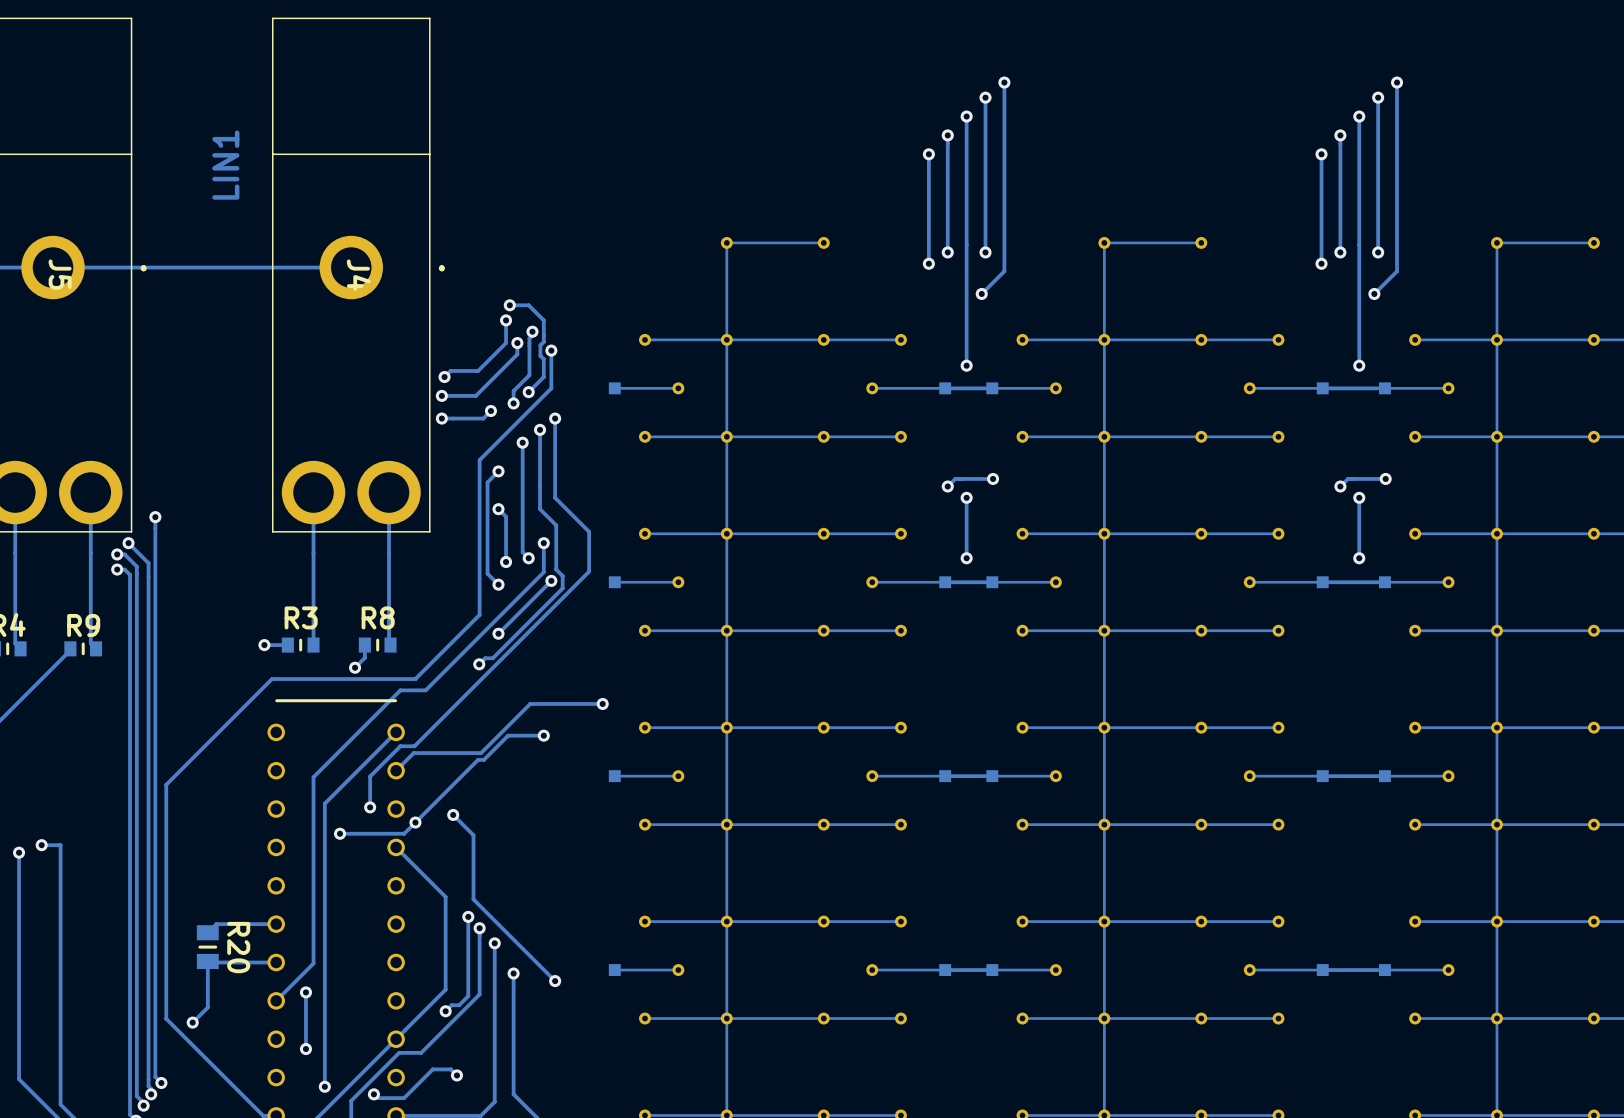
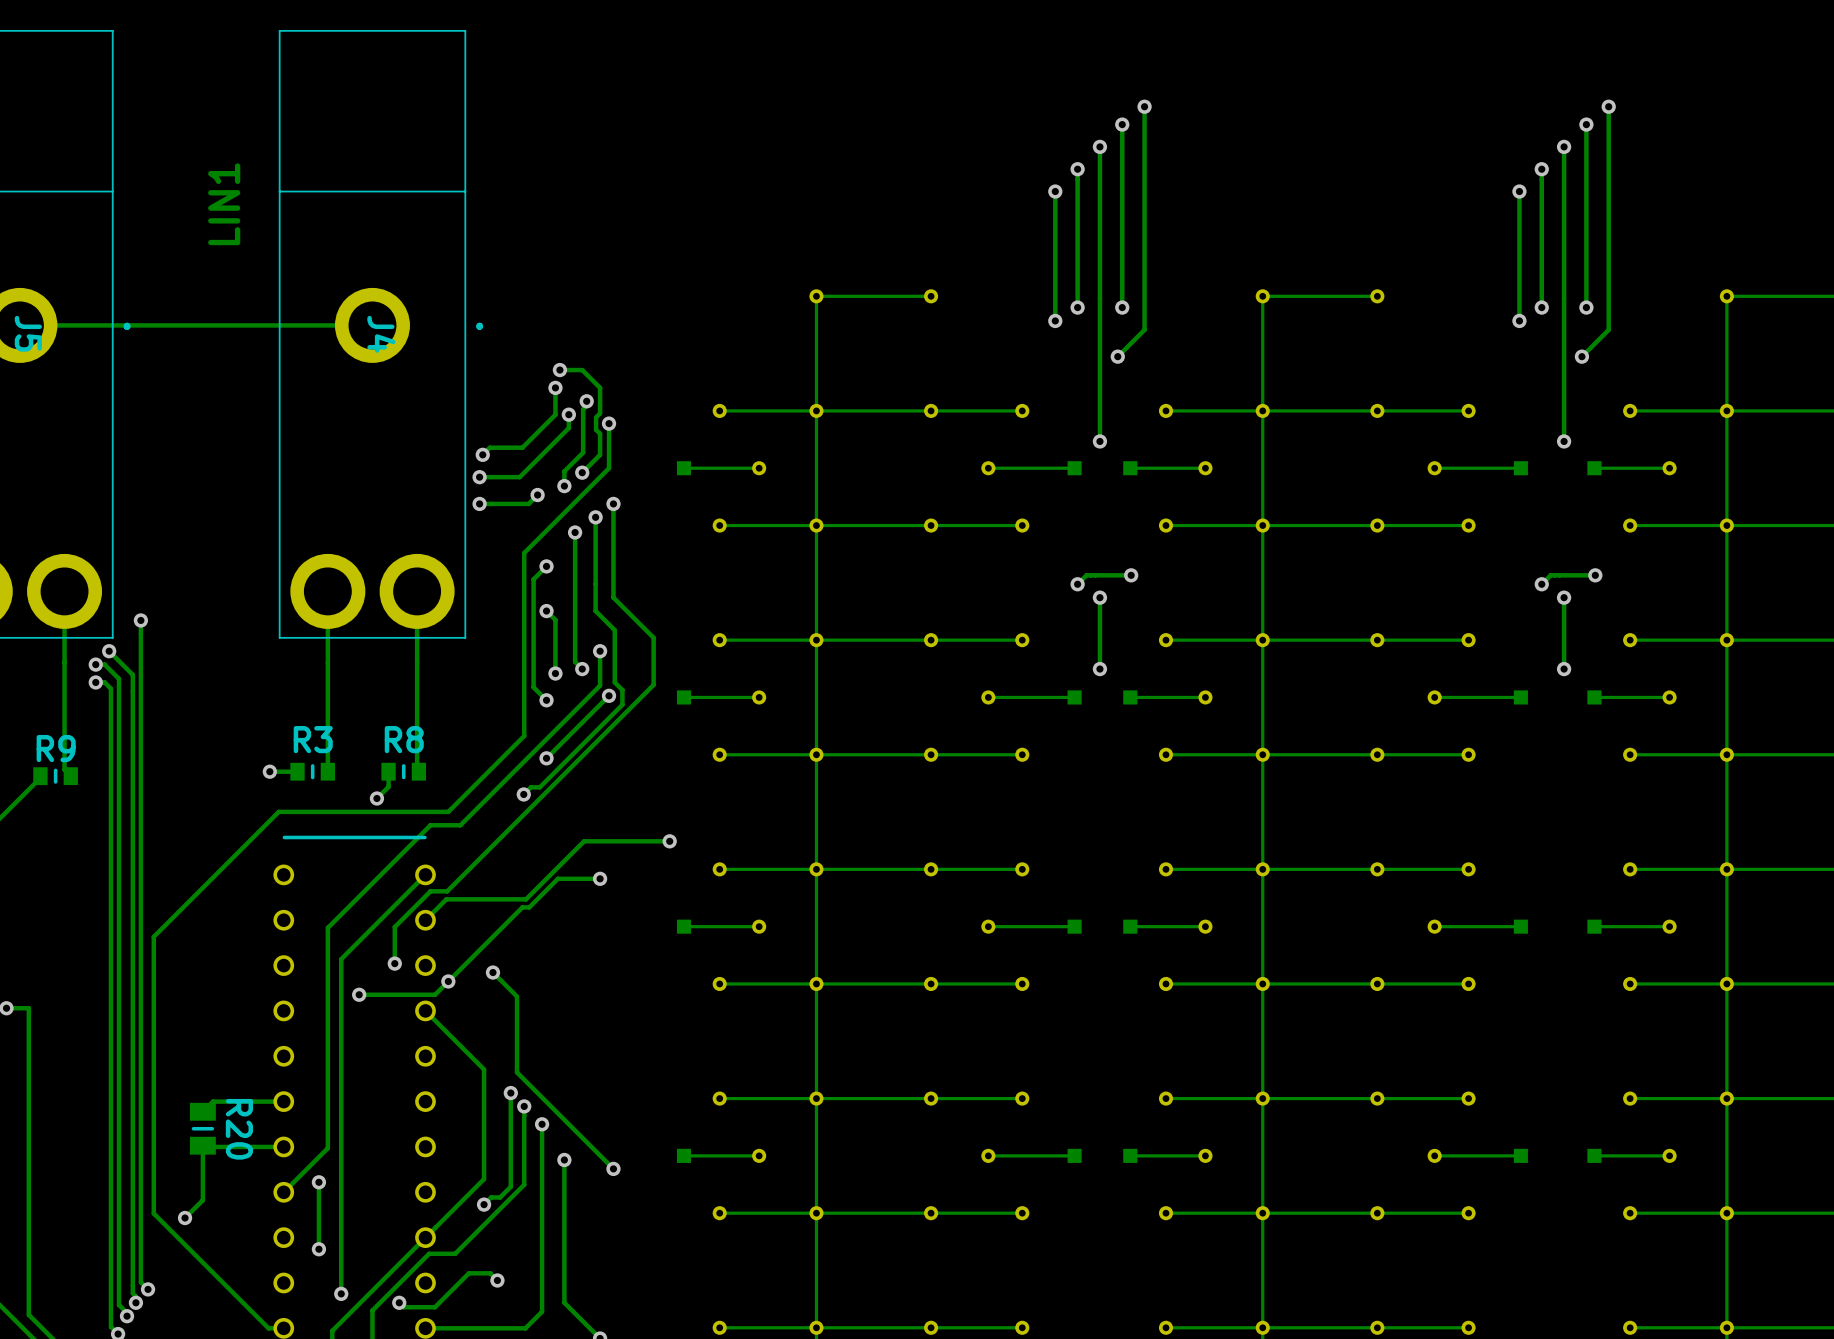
track: (992, 388) (945, 388) -> none
track: (1384, 388) (1324, 388) -> none
track: (992, 582) (945, 582) -> none
track: (1383, 582) (1322, 582) -> none
track: (992, 776) (945, 776) -> none
track: (1383, 776) (1322, 776) -> none
track: (992, 970) (945, 970) -> none
track: (1383, 970) (1322, 970) -> none

